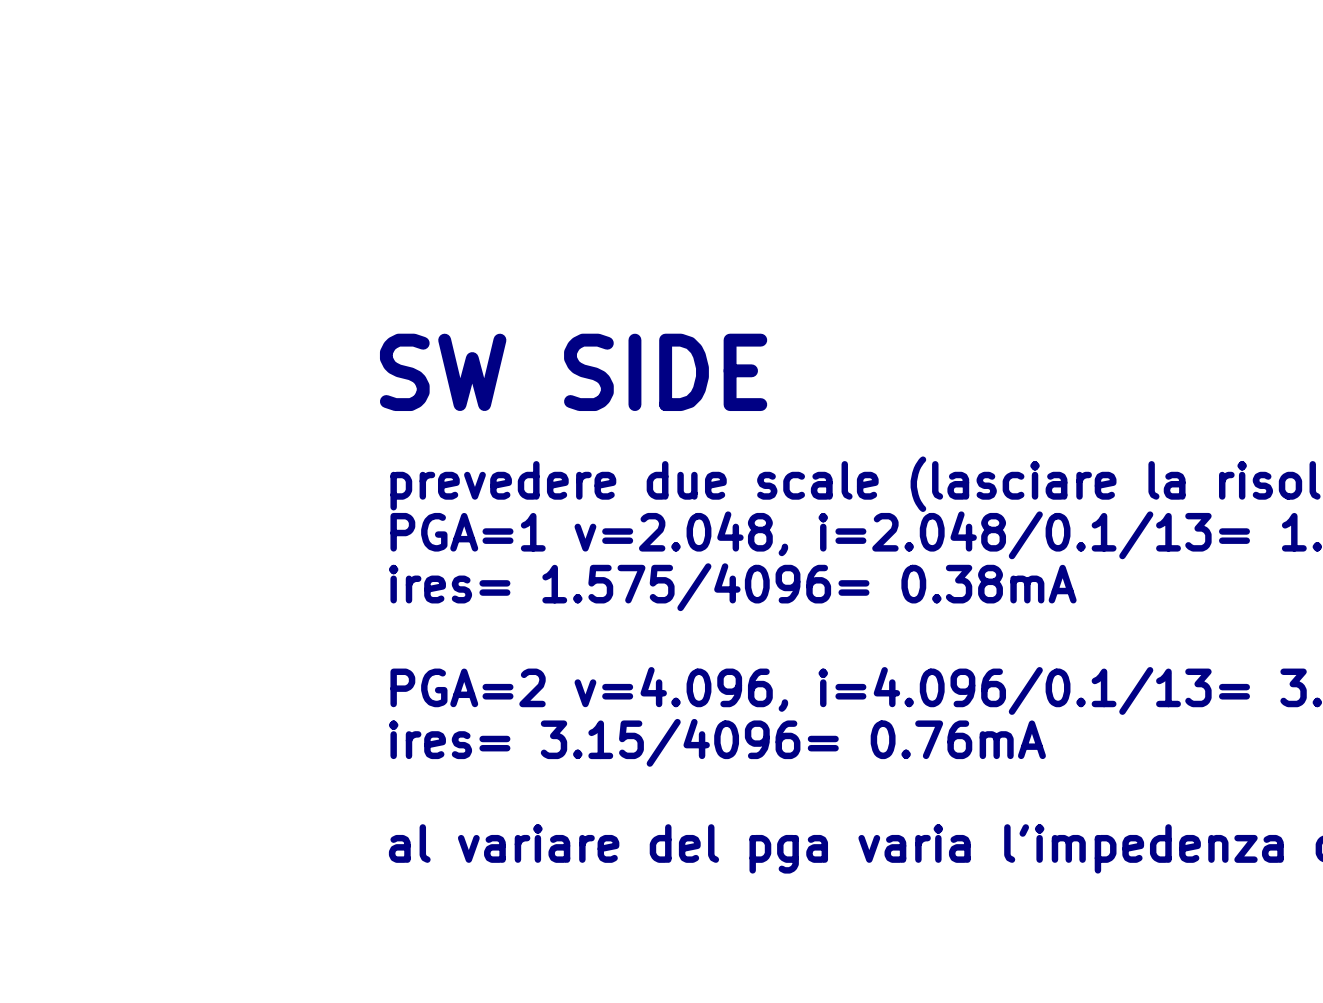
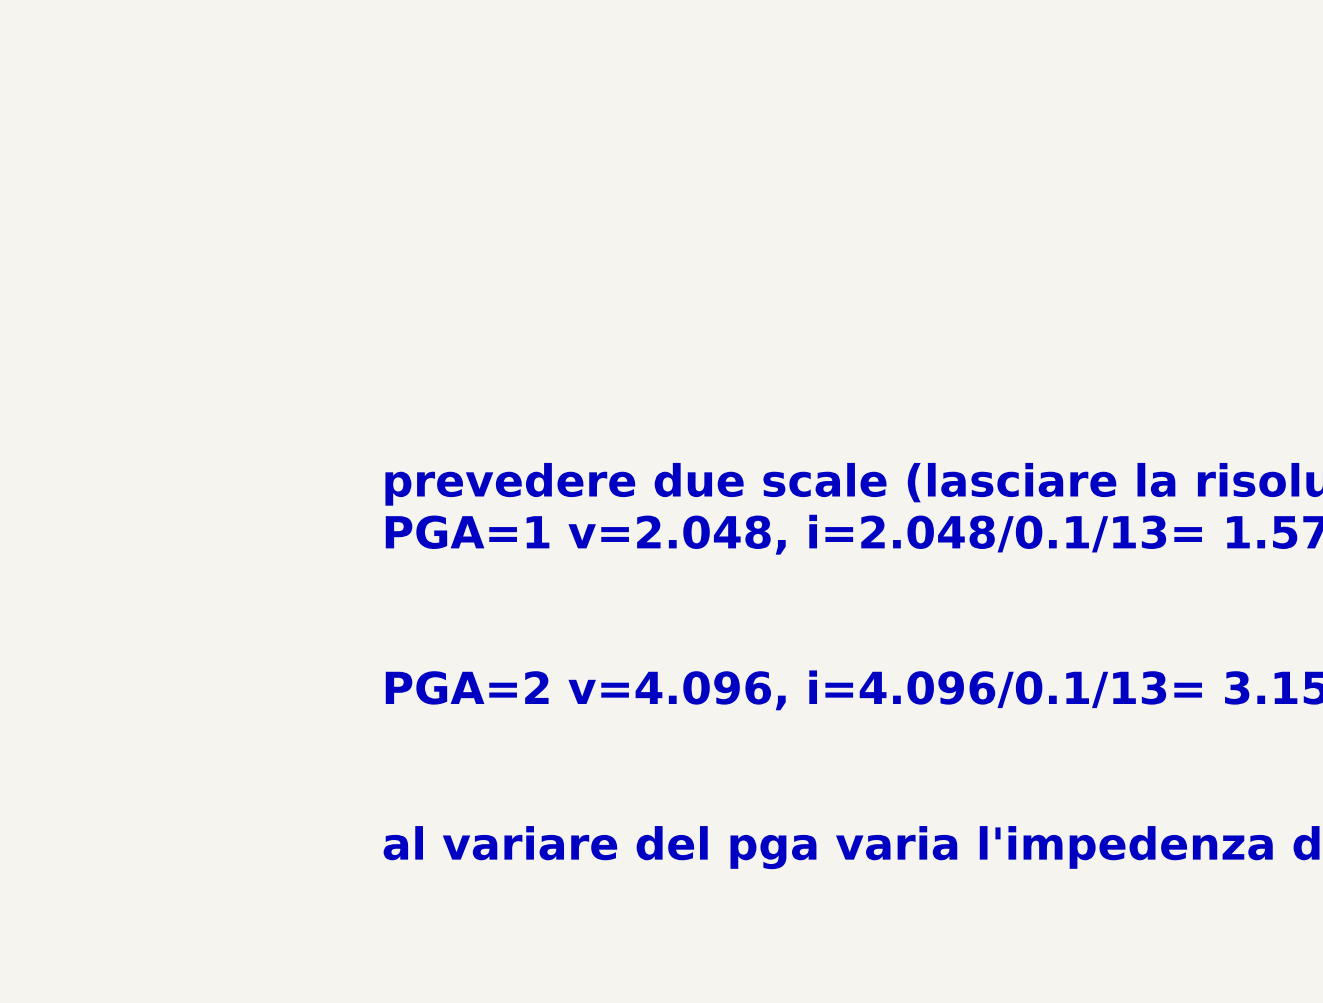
text: SW SIDE (573, 372) -> none
text: ires= 1.575/4096= 0.38mA (732, 587) -> none
text: ires= 3.15/4096= 0.76mA (717, 742) -> none

